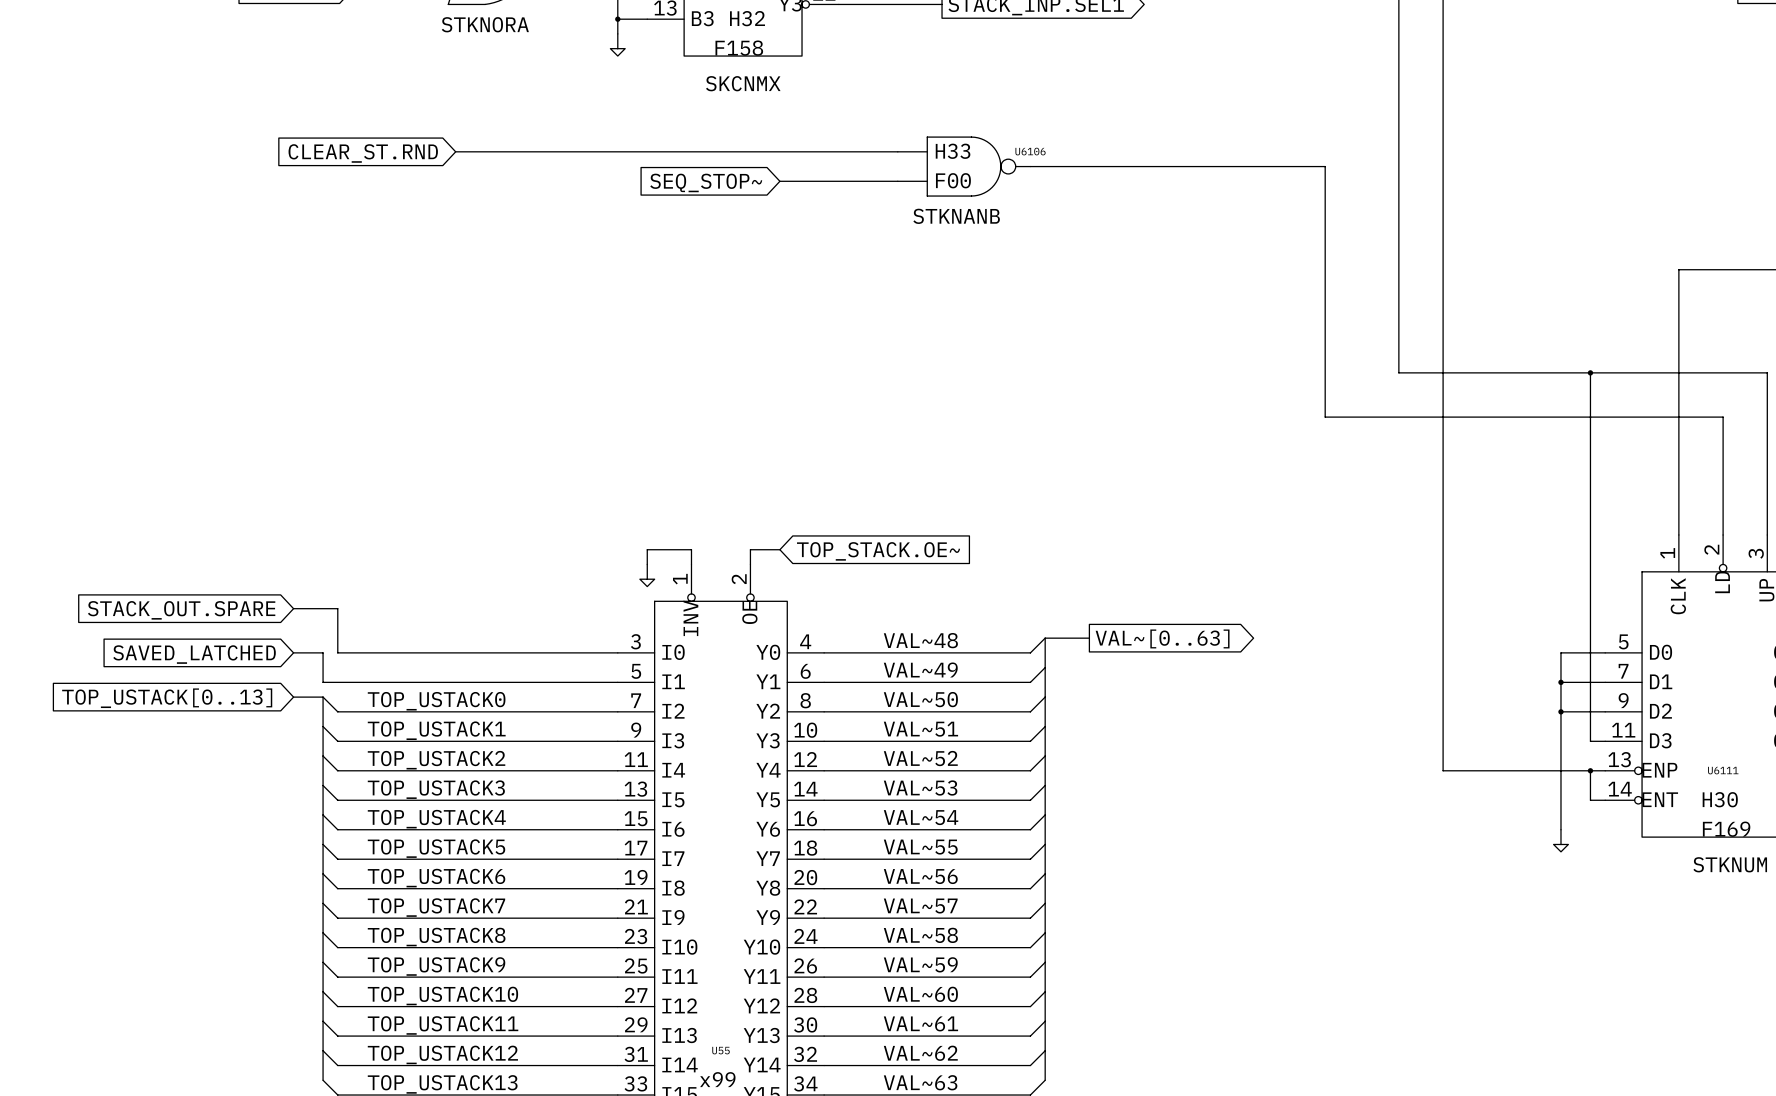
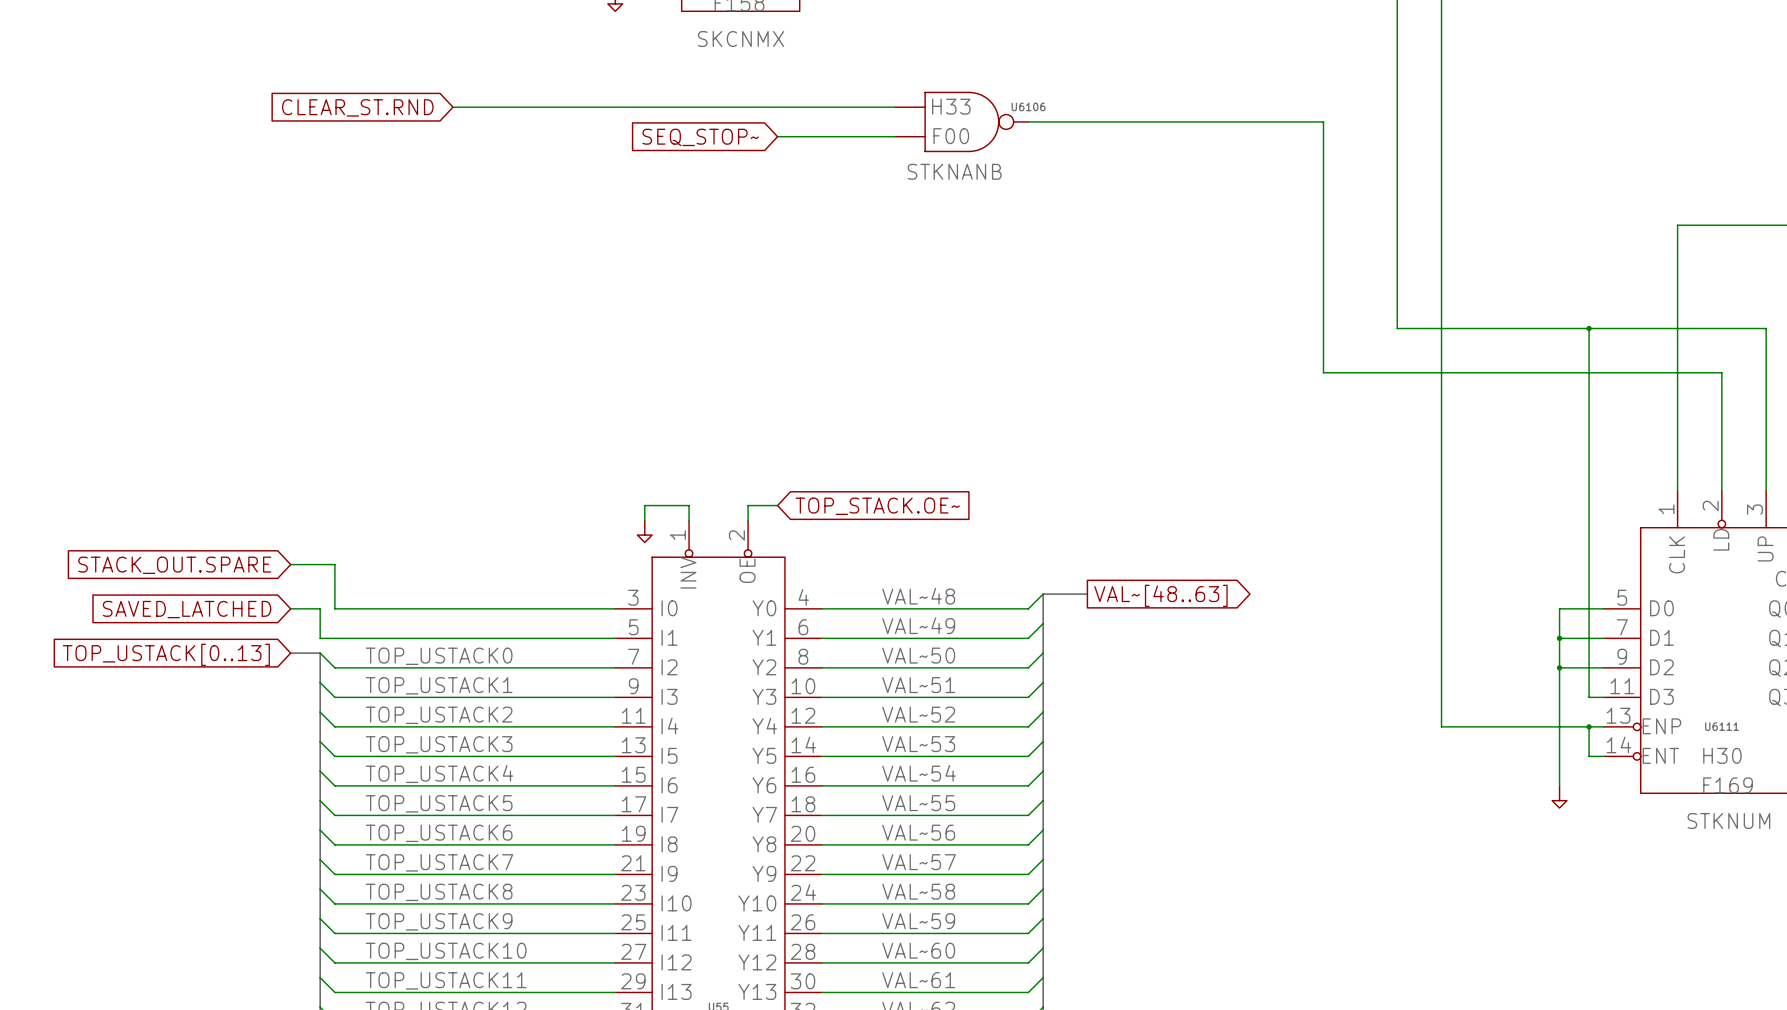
global label: VAL~[0..63] (1162, 638) -> VAL~[48..63] (1160, 595)

